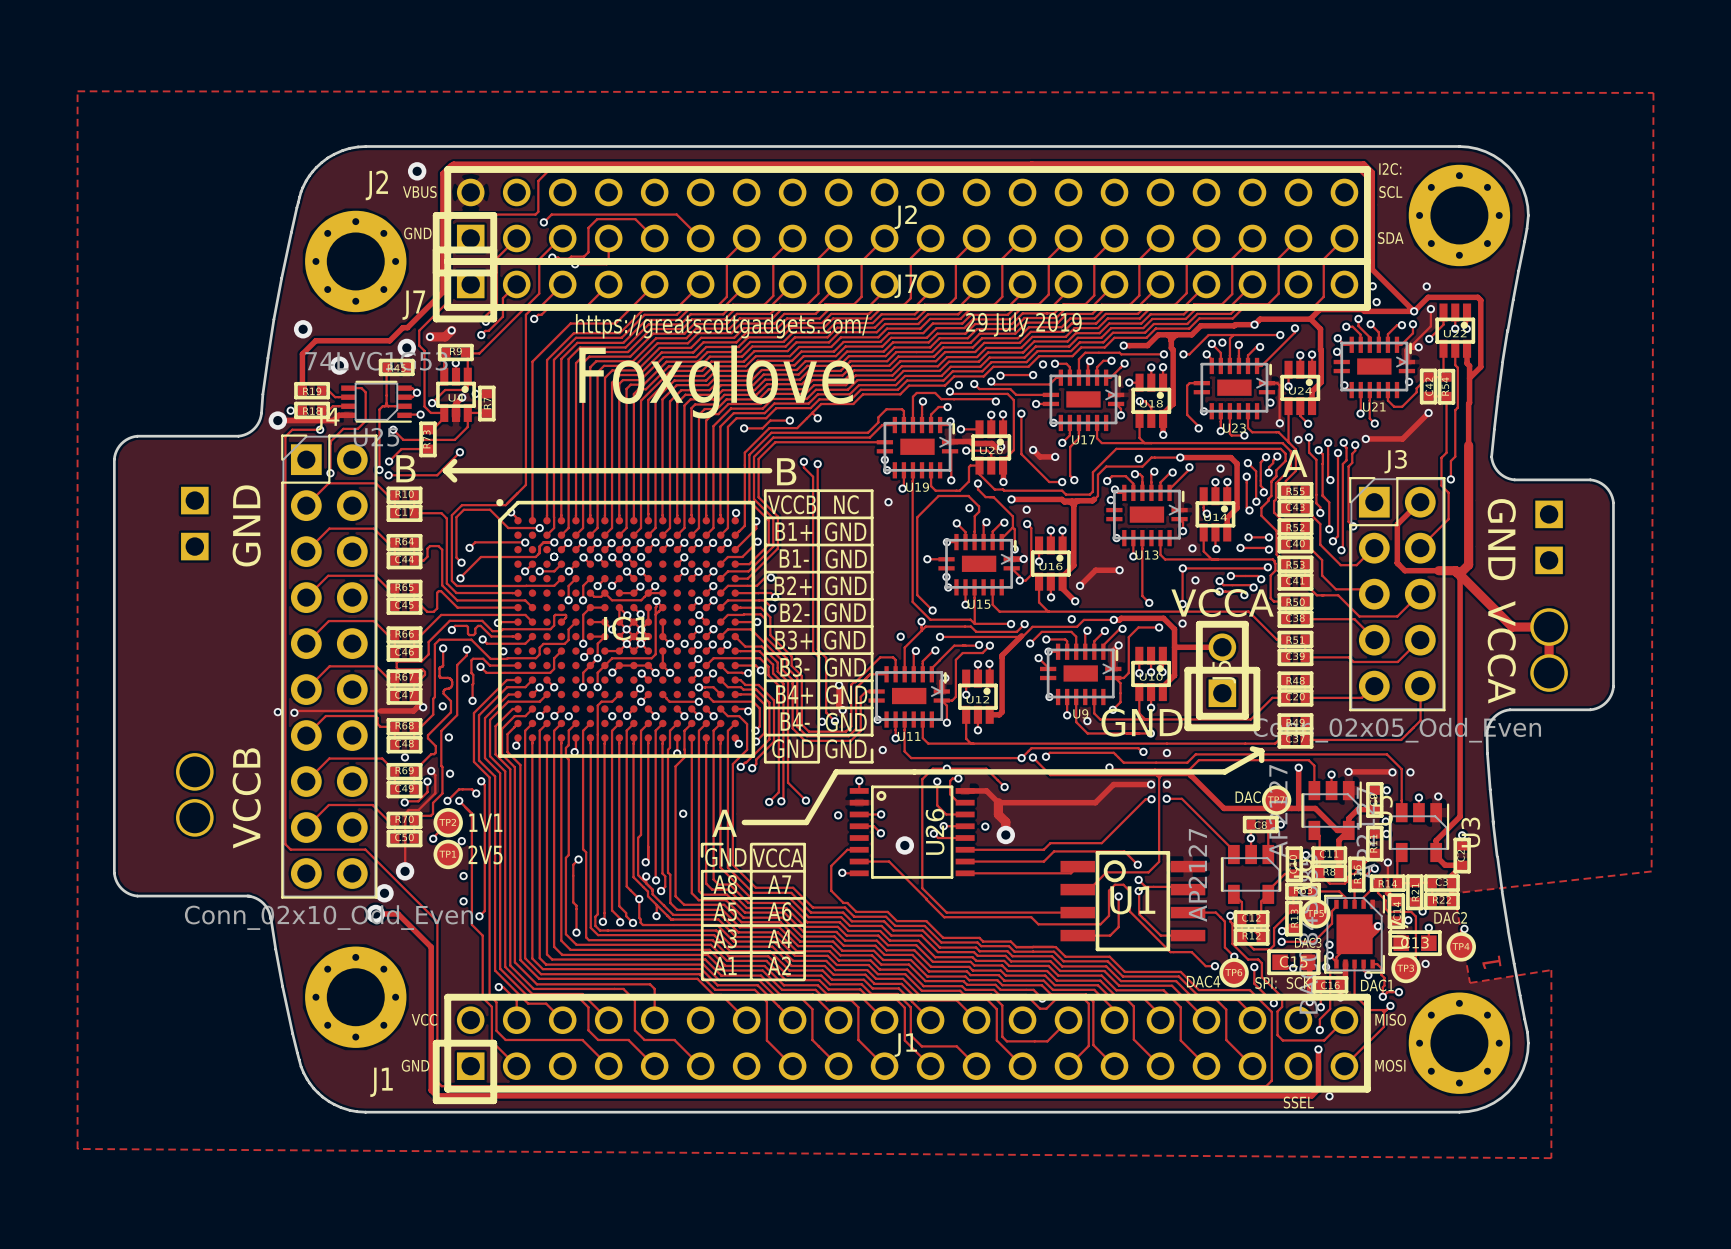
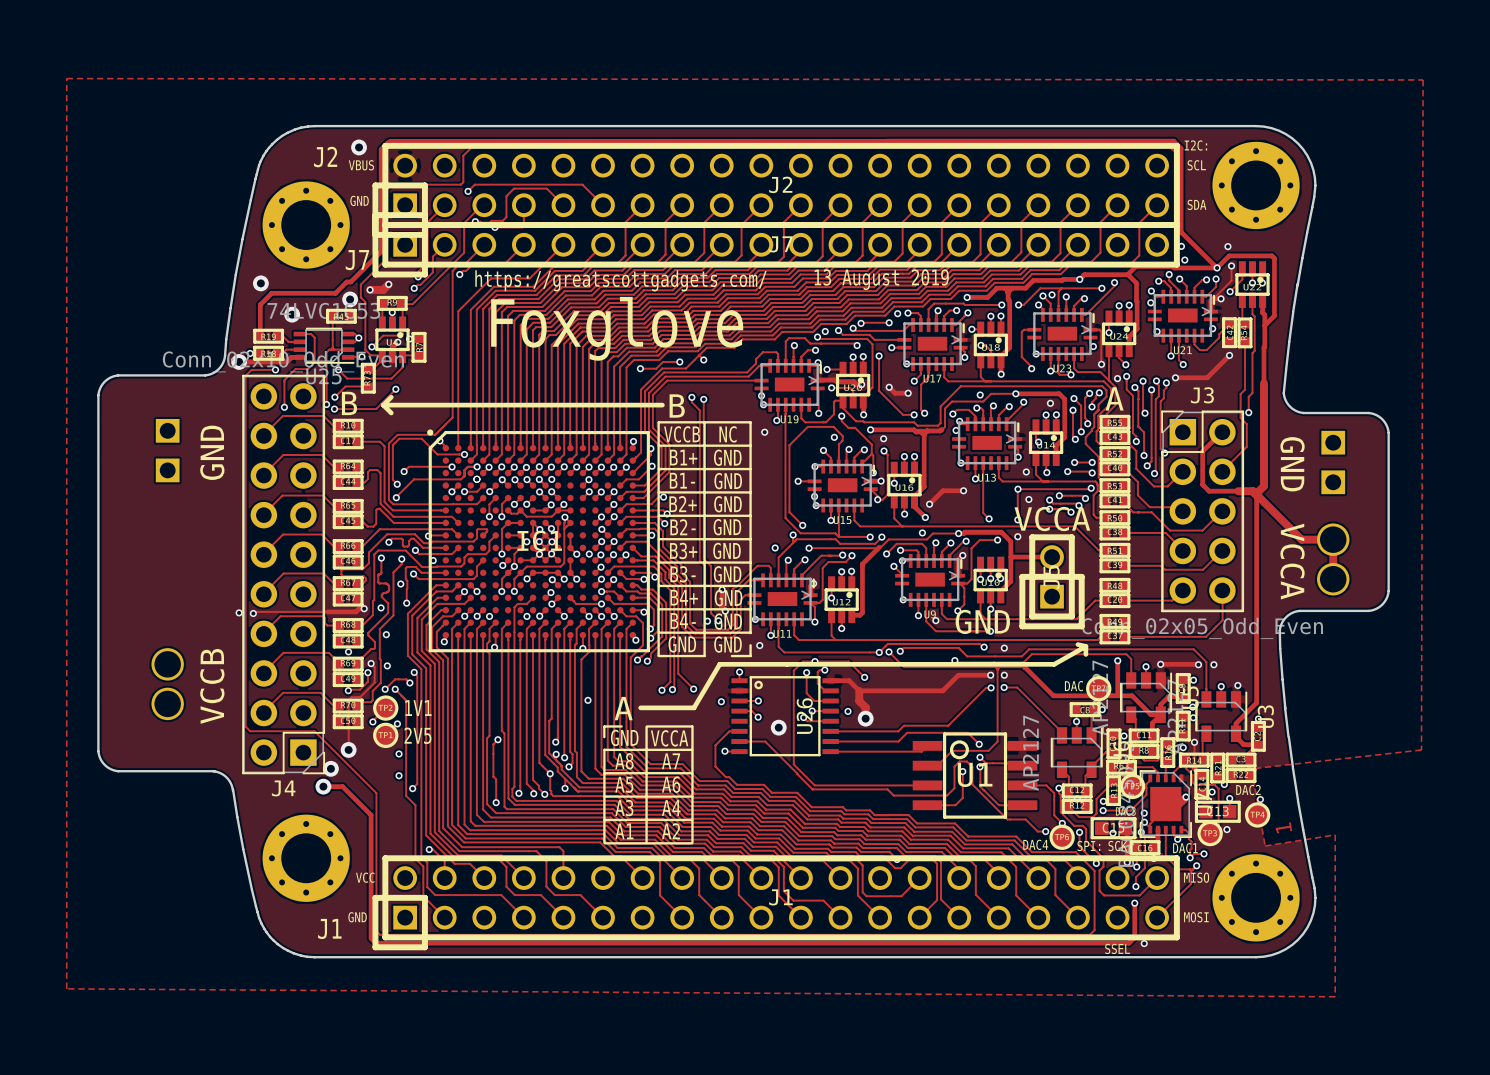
text: 29 July 2019 (1023, 324) -> 13 August 2019 (881, 279)
J4 rotation: 0° (329, 666) -> 180° (283, 574)

